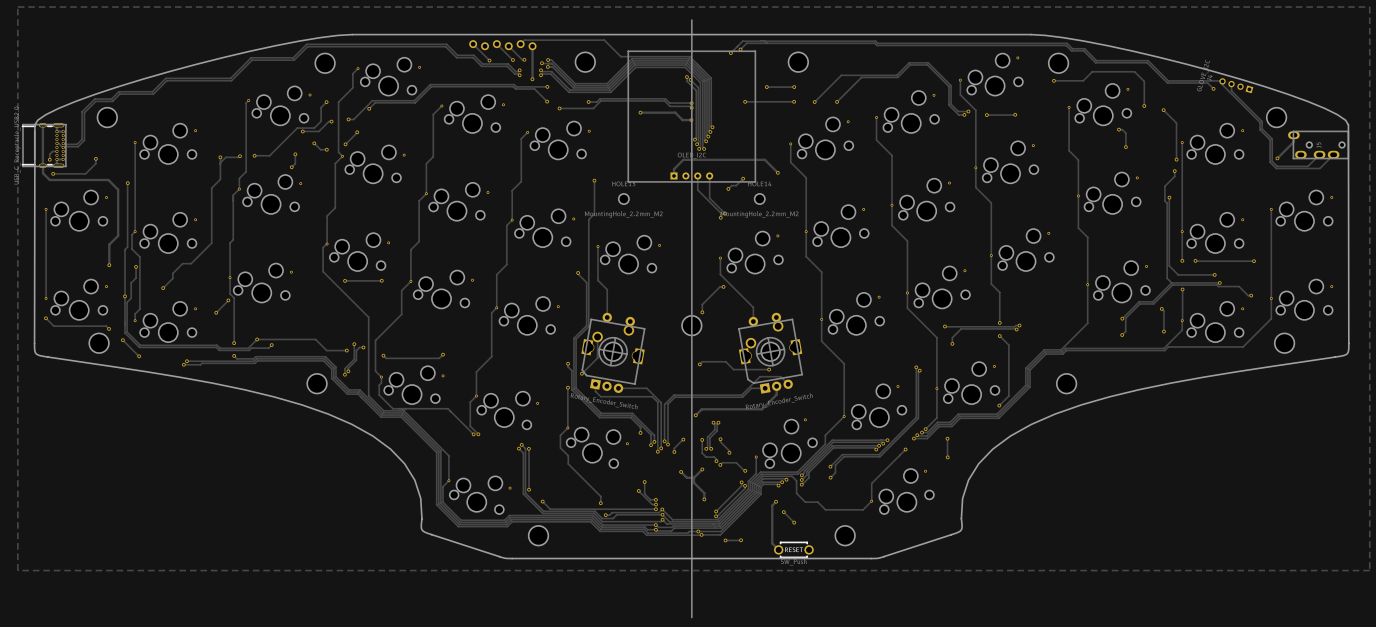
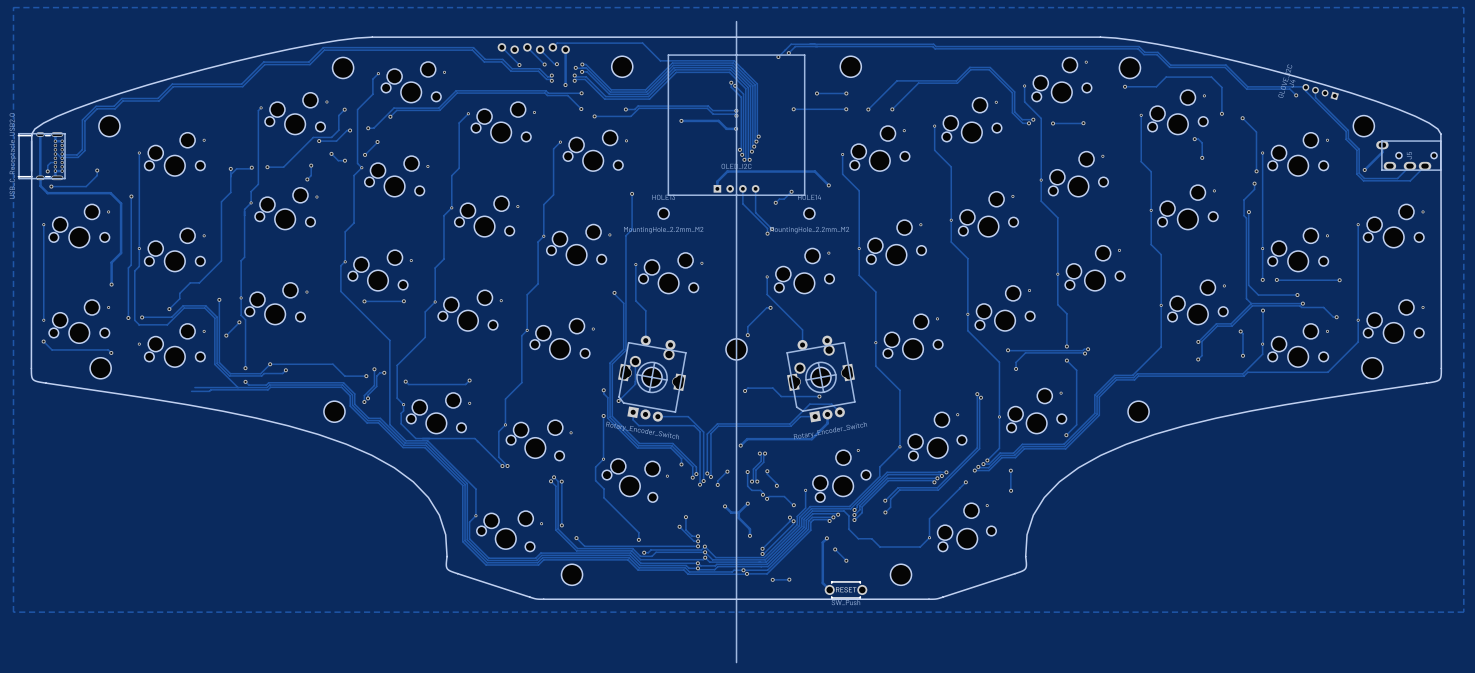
track: (135, 231) (132, 234) (132, 249) (139, 256) (139, 309) (135, 313) (135, 320) -> (139, 248) (139, 266) (134, 270) (134, 320) (138, 324) (167, 324) (184, 308) (204, 308) (214, 318) (214, 364) (238, 387)
track: (136, 266) (136, 278) (131, 282) (131, 298) (127, 302) (127, 332) (140, 345) (217, 345) -> (219, 299) (219, 362) (227, 370)
via: (136, 266) -> none
via: none -> (219, 299)
via: none -> (142, 317)
track: (124, 296) (124, 332) (139, 347) (216, 347) -> (142, 317) (171, 317) (183, 305) (205, 305) (217, 317) (217, 363) (226, 372)
track: (122, 340) (139, 356) -> none
via: (122, 340) -> none
via: (139, 356) -> none
via: (186, 361) -> none
via: (183, 364) -> none

